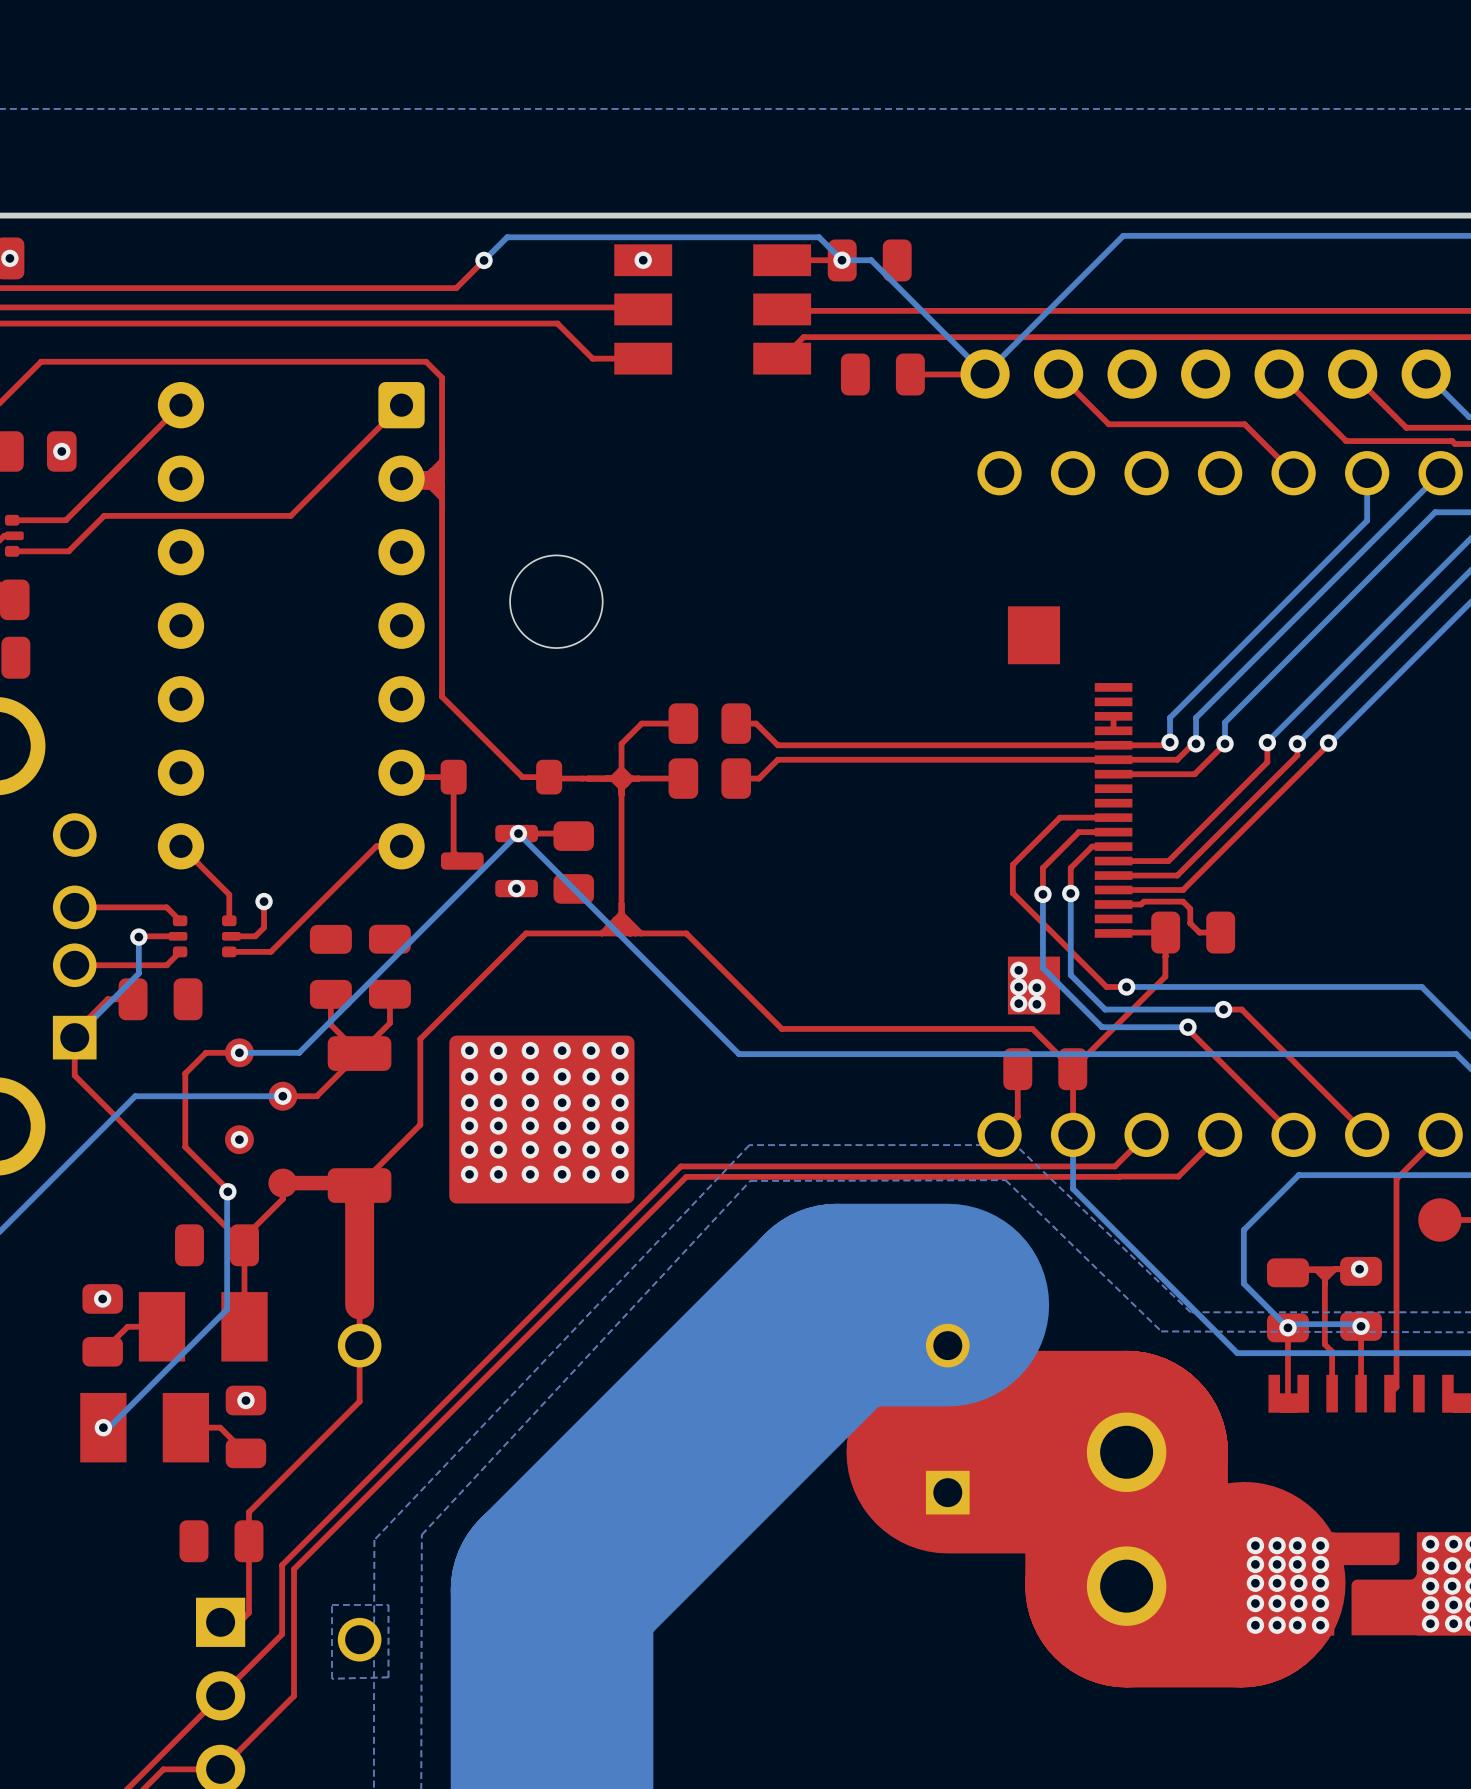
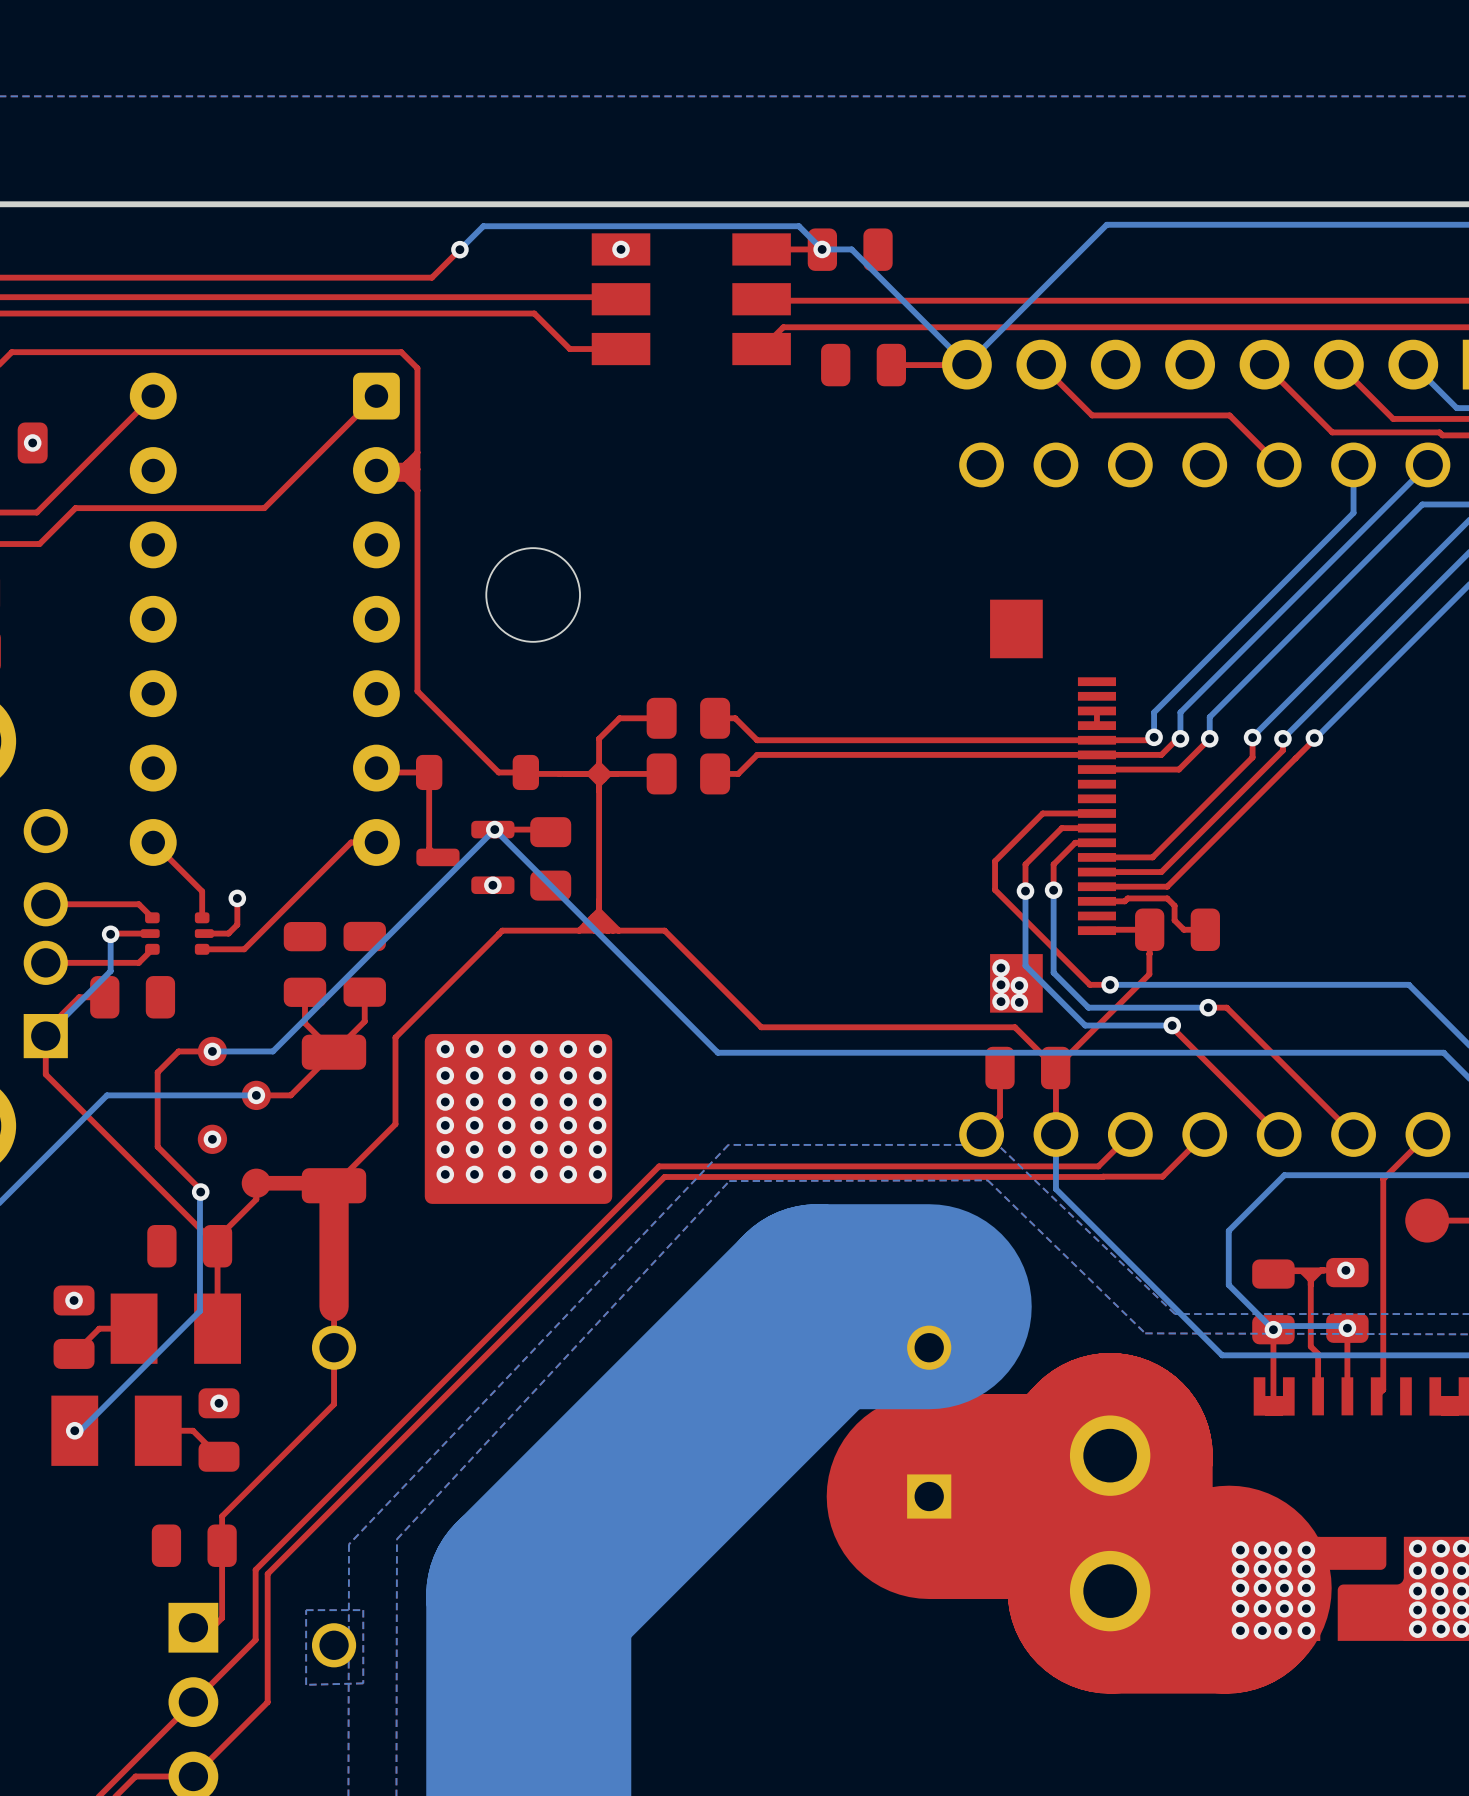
top track: (1126, 1452) (947, 1452) -> (1110, 1455) (1069, 1496) (929, 1496)

